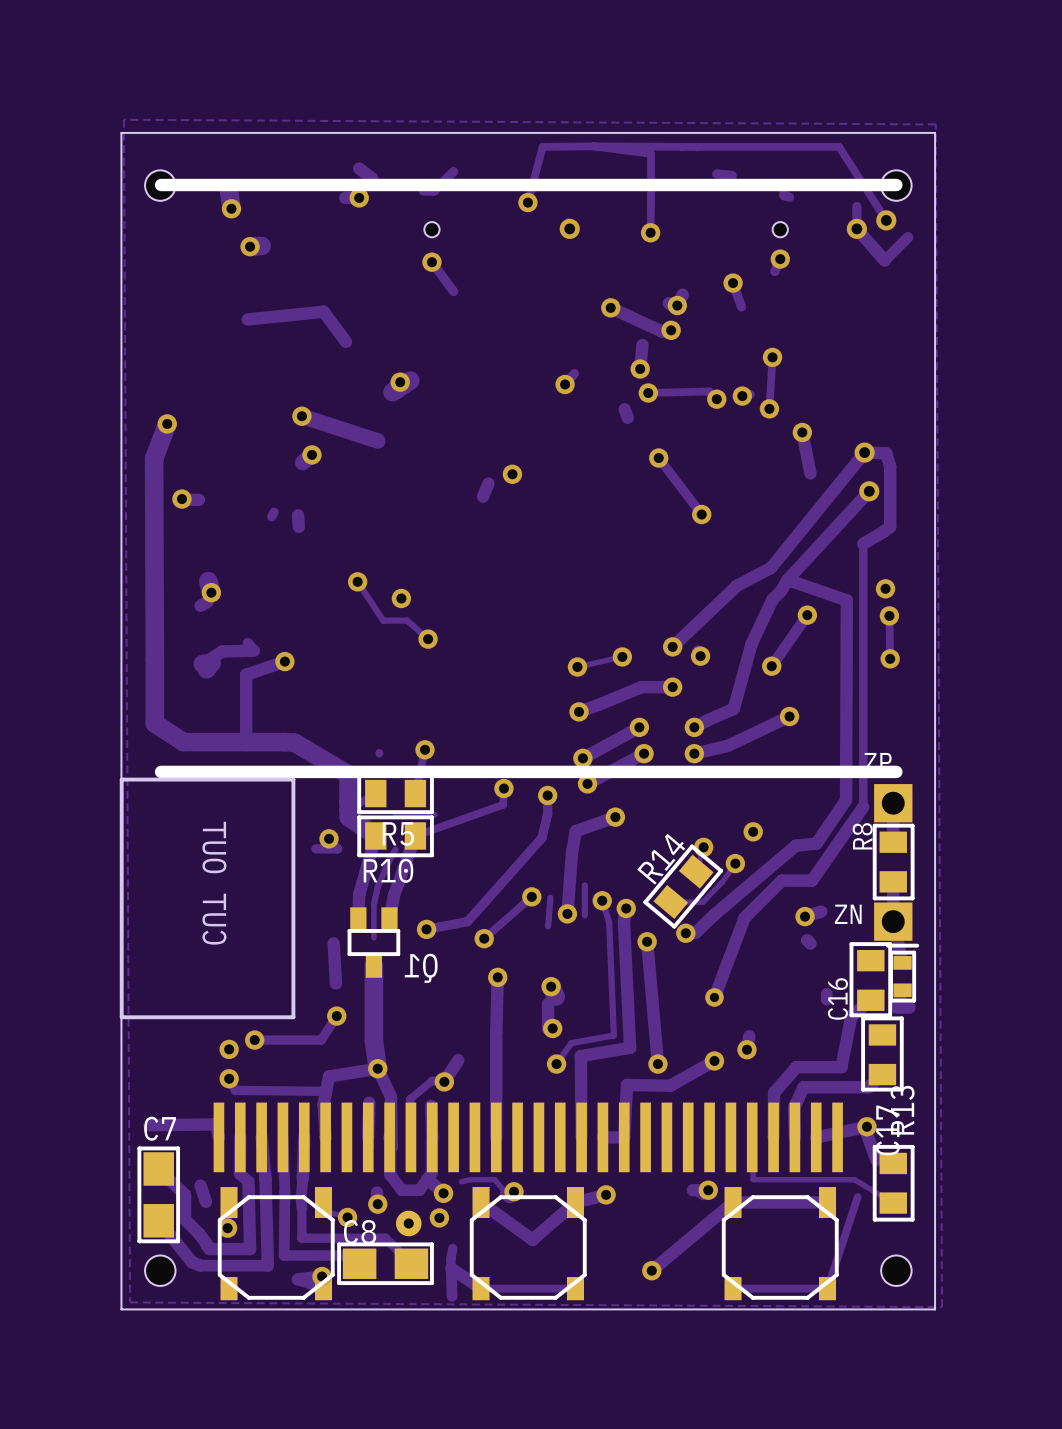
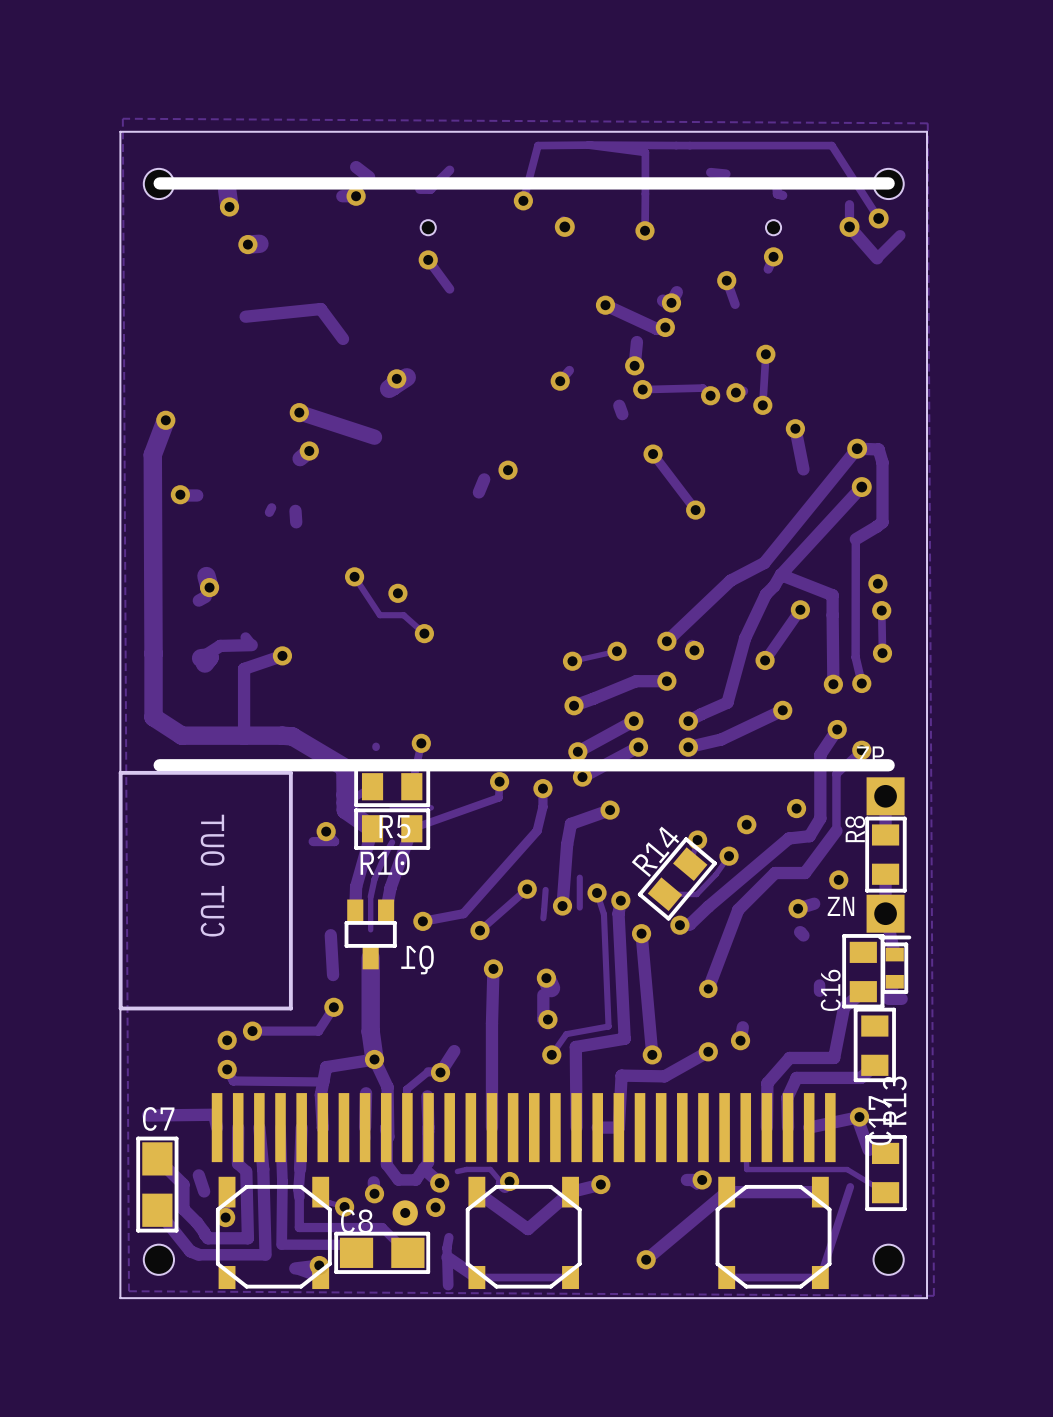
track: (863, 543) (863, 807) (812, 880) -> (855, 539) (855, 657) (861, 683)
track: (787, 579) (846, 600) (846, 800) (816, 843) -> (780, 574) (832, 595) (833, 684)
via: none -> (861, 683)
via: none -> (833, 684)
track: none -> (837, 729) (820, 754) (820, 818) (809, 836)
via: none -> (837, 729)
track: none -> (861, 750) (836, 774) (836, 830) (805, 873)
via: none -> (861, 750)
via: none -> (796, 808)
via: none -> (838, 879)

